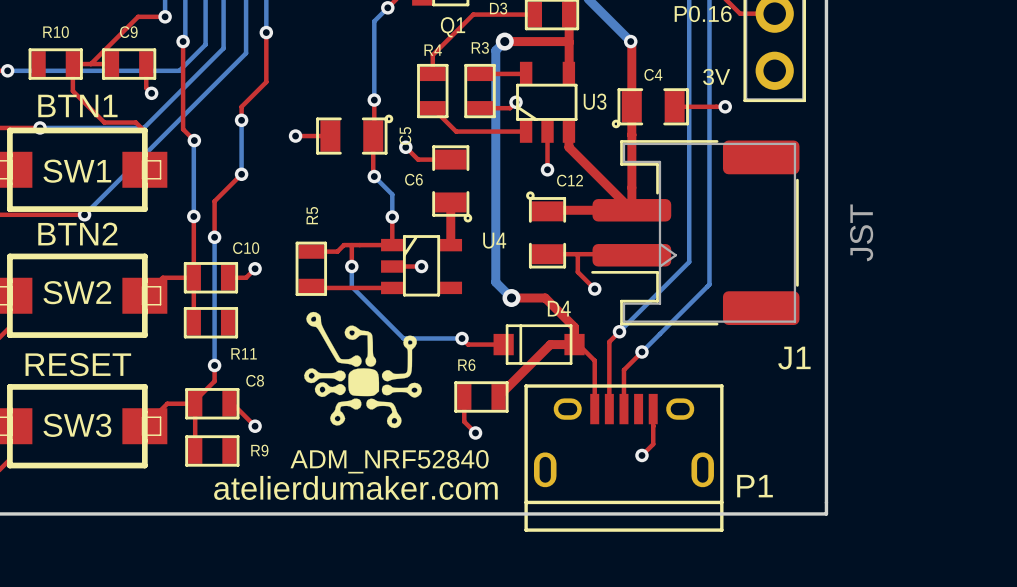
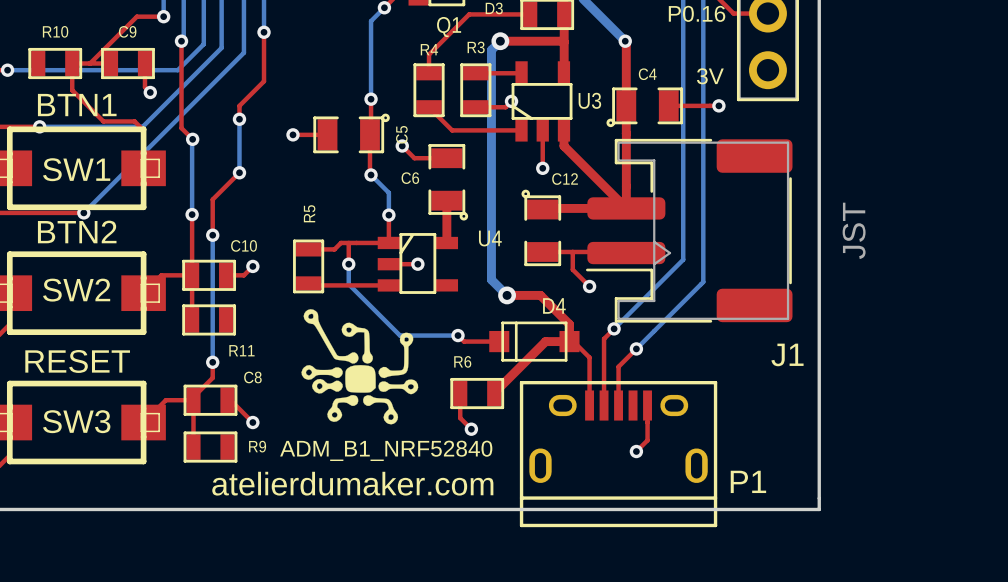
text: ADM_NRF52840 (389, 461) -> ADM_B1_NRF52840 (386, 450)

